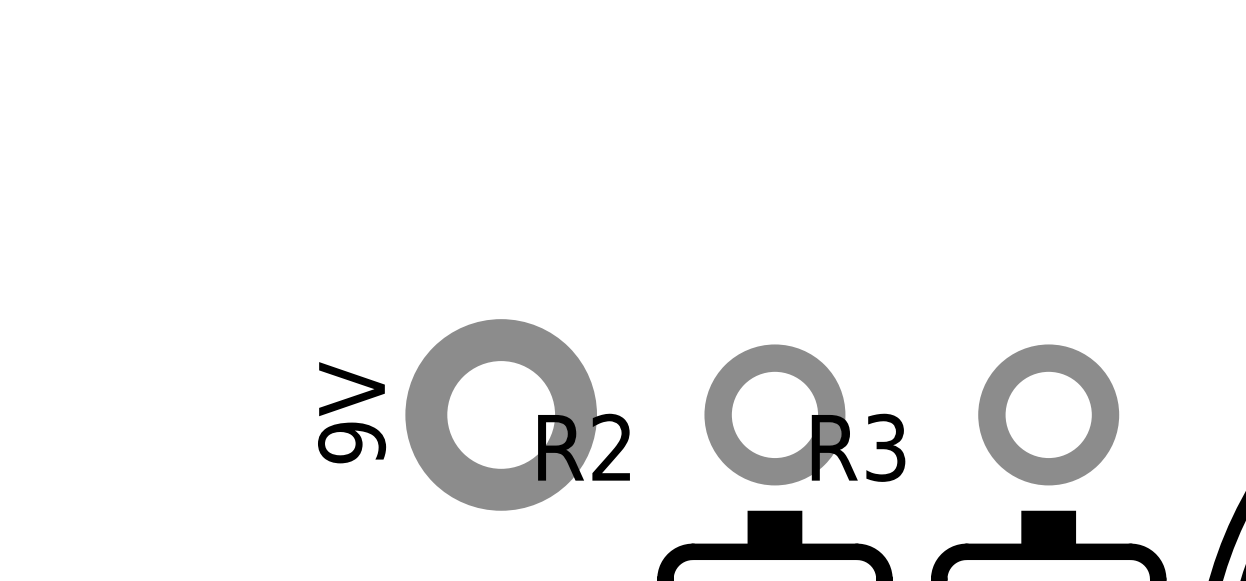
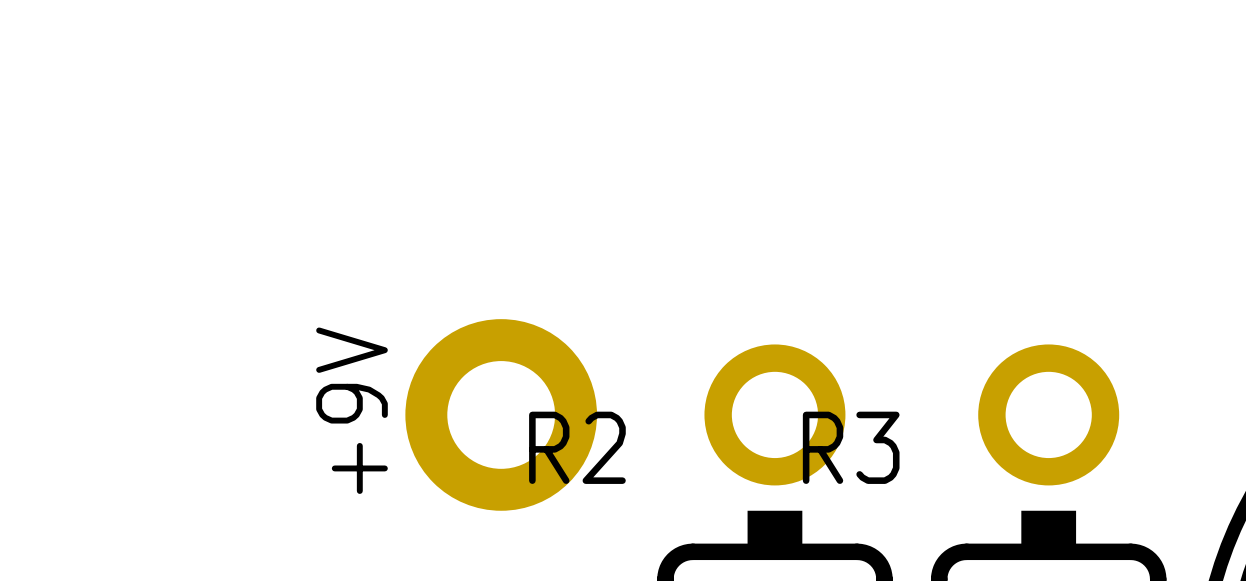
9V name: 9V (352, 412) -> +9V (352, 410)

